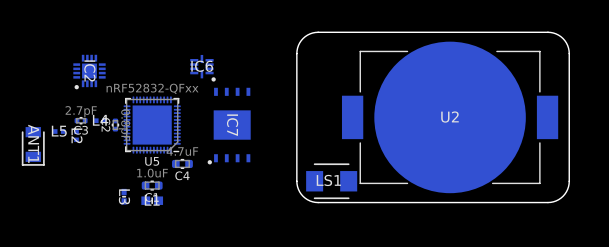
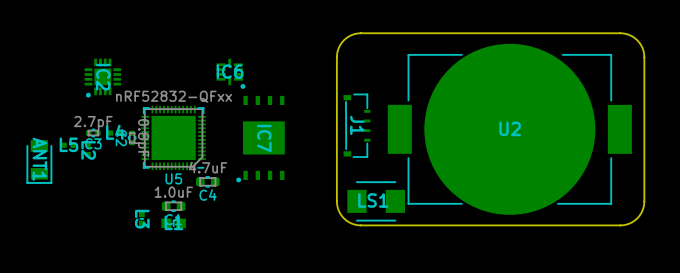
J1: none -> (356, 125)

